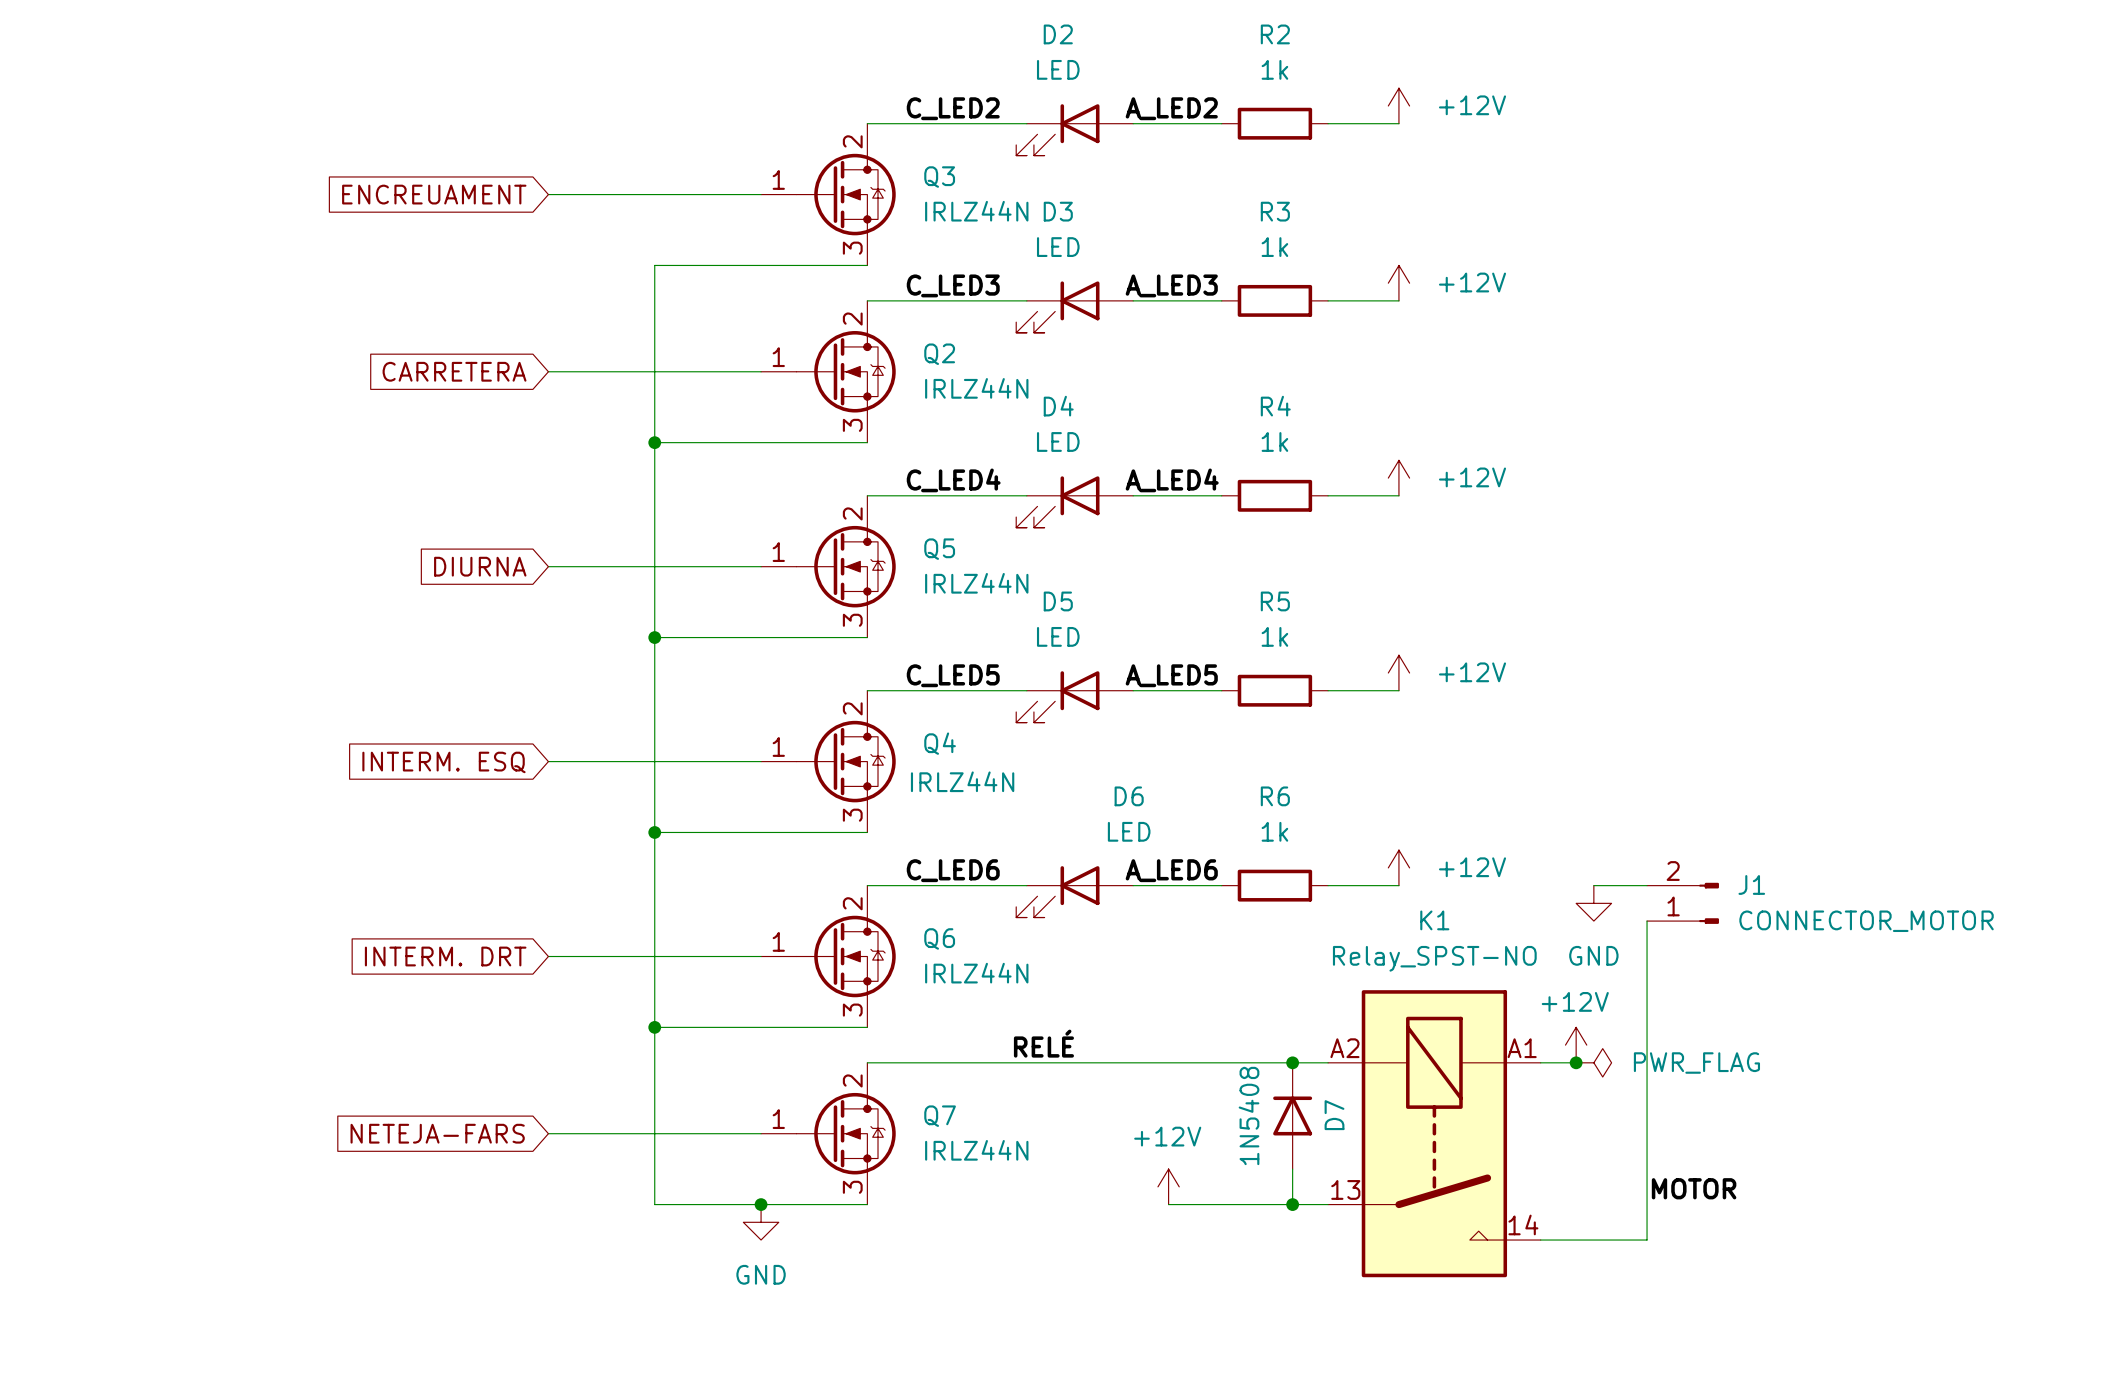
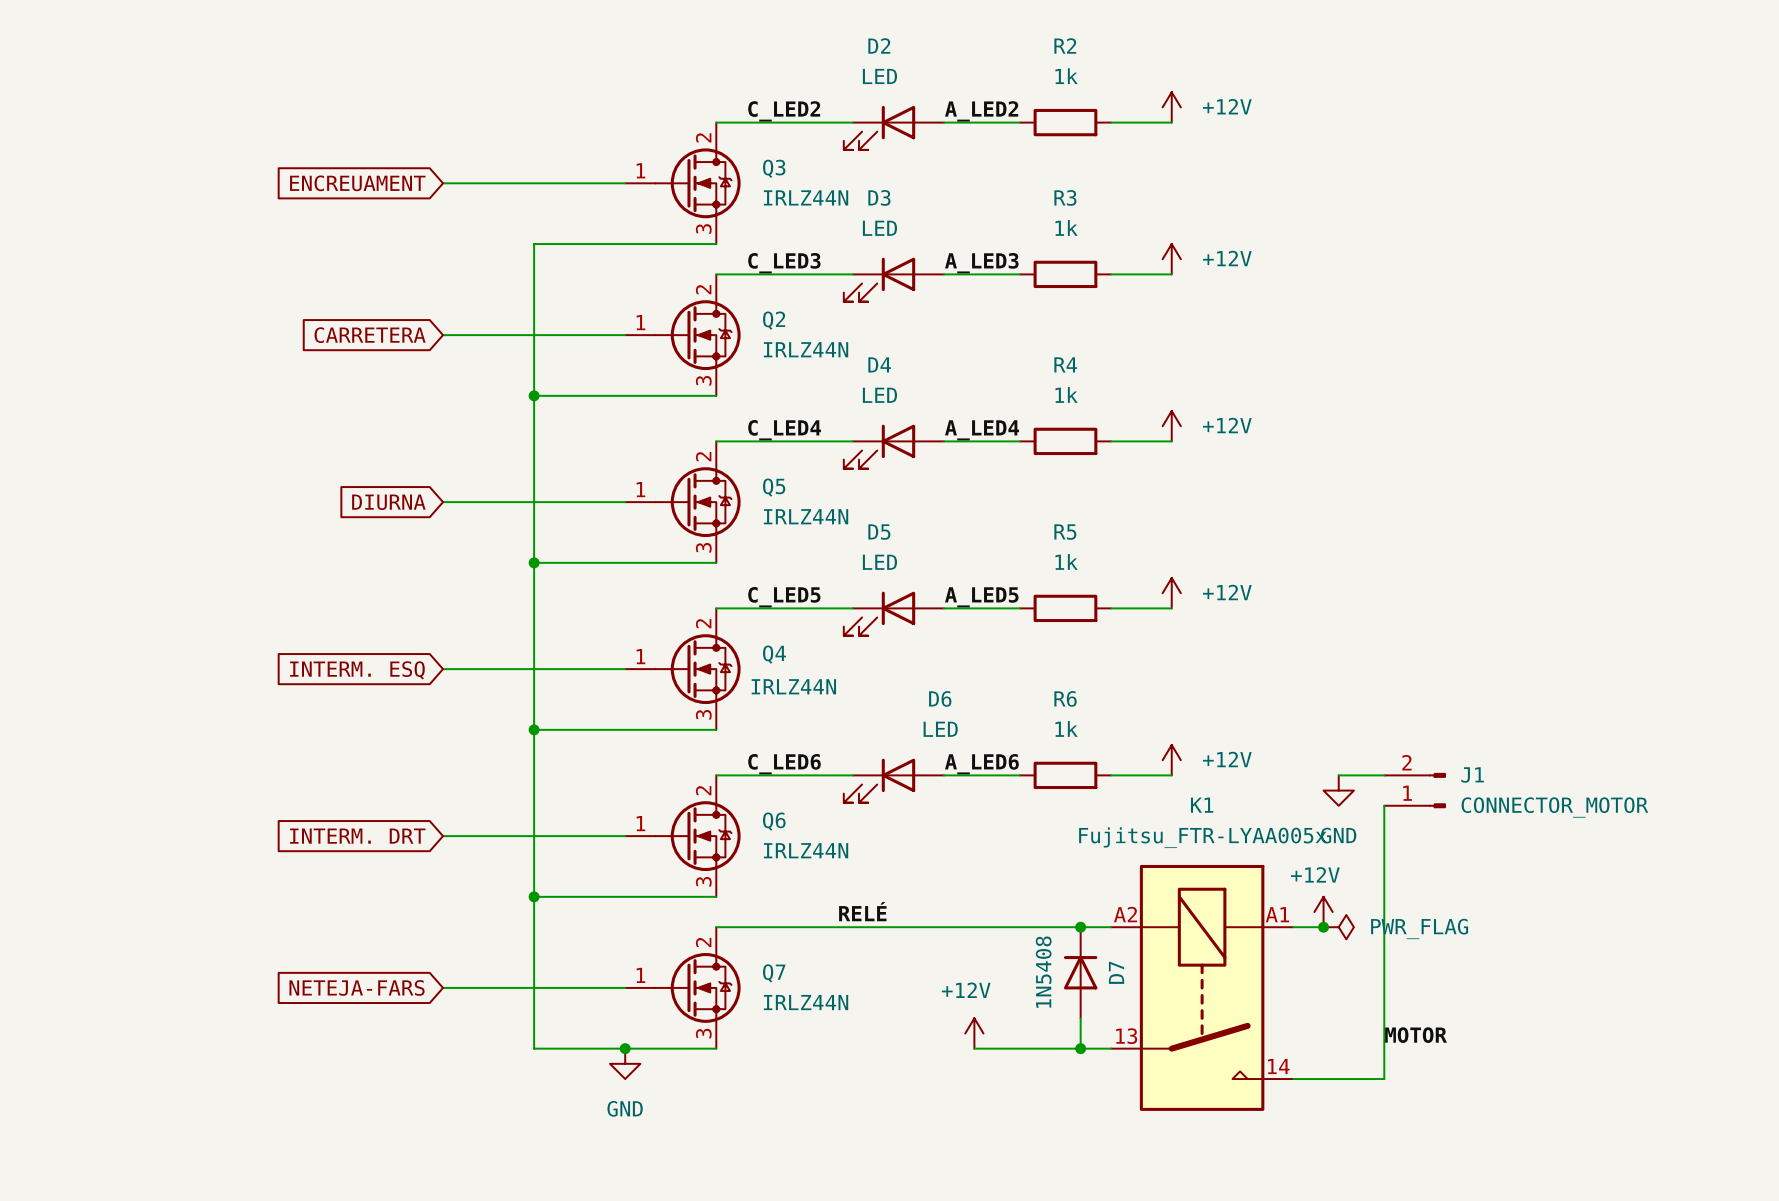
K1 value: Relay_SPST-NO (1434, 958) -> Fujitsu_FTR-LYAA005x (1202, 837)

